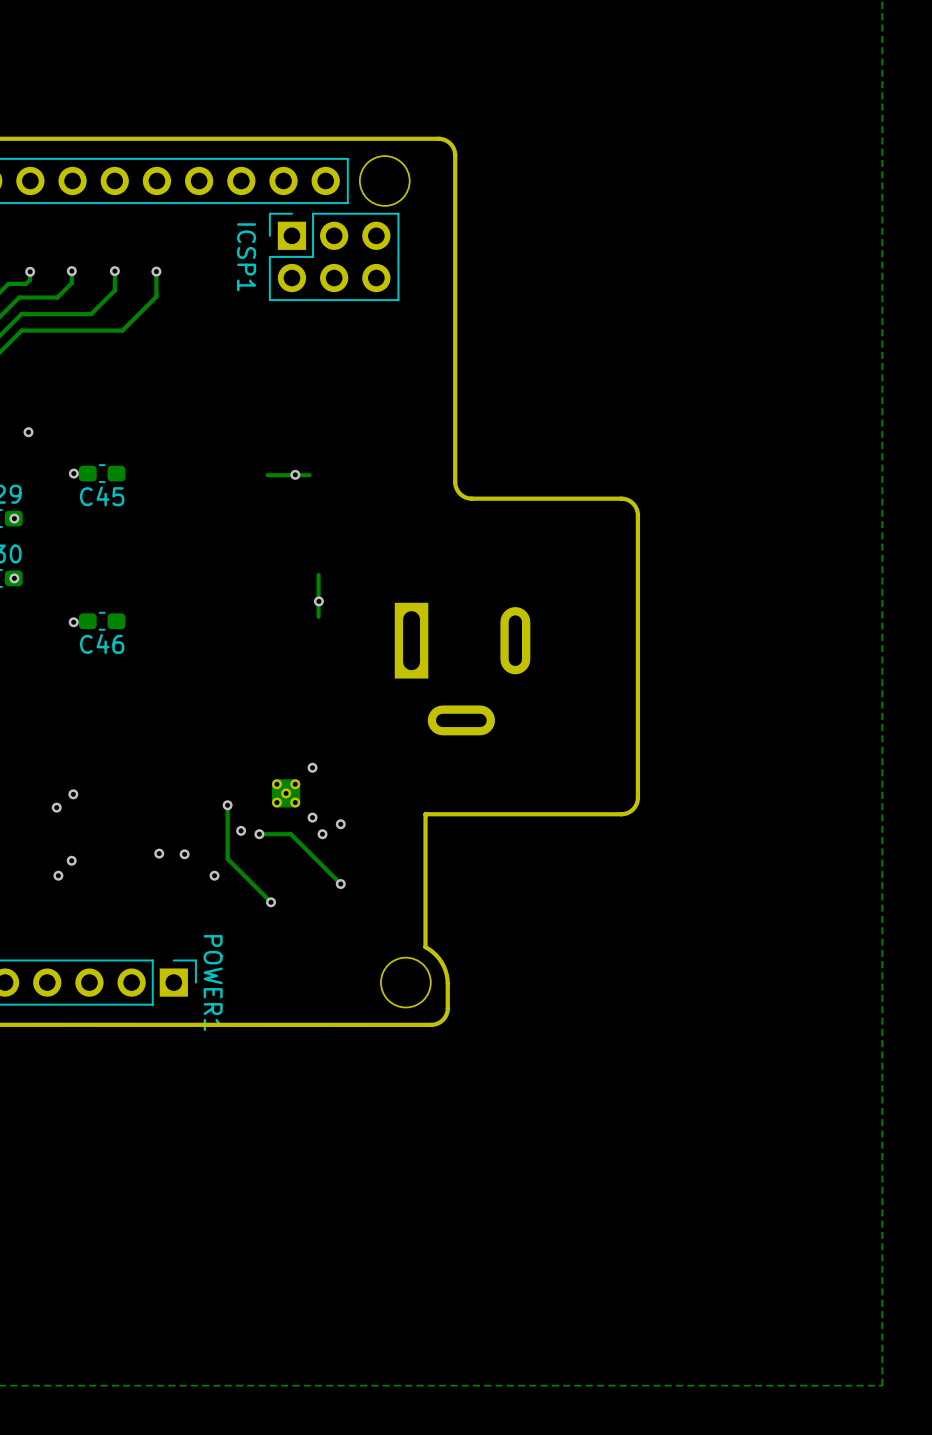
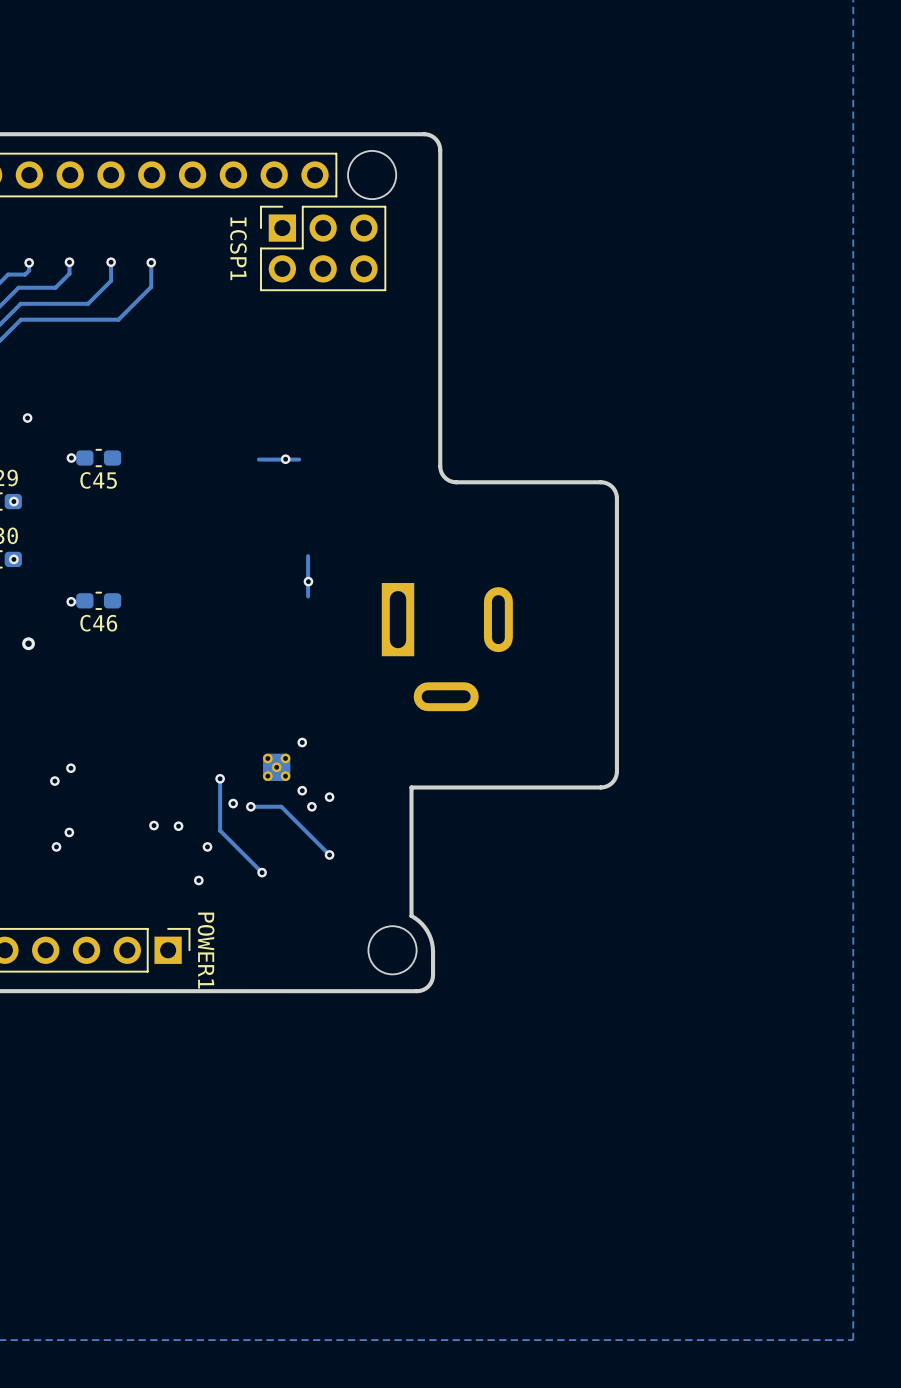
via: none -> (28, 643)
via: none -> (198, 880)

